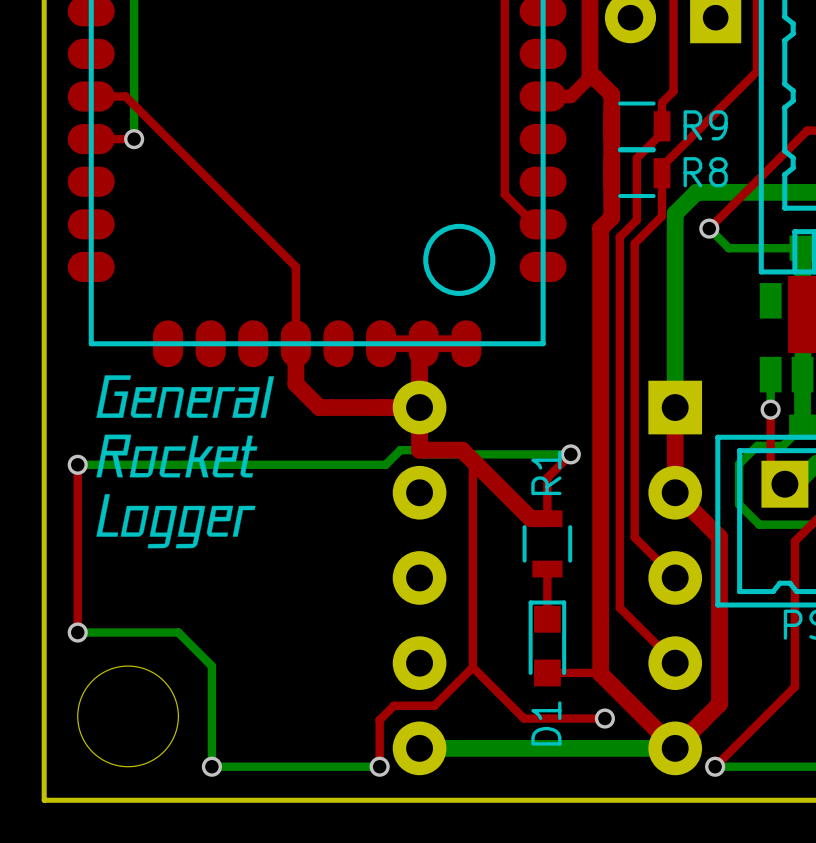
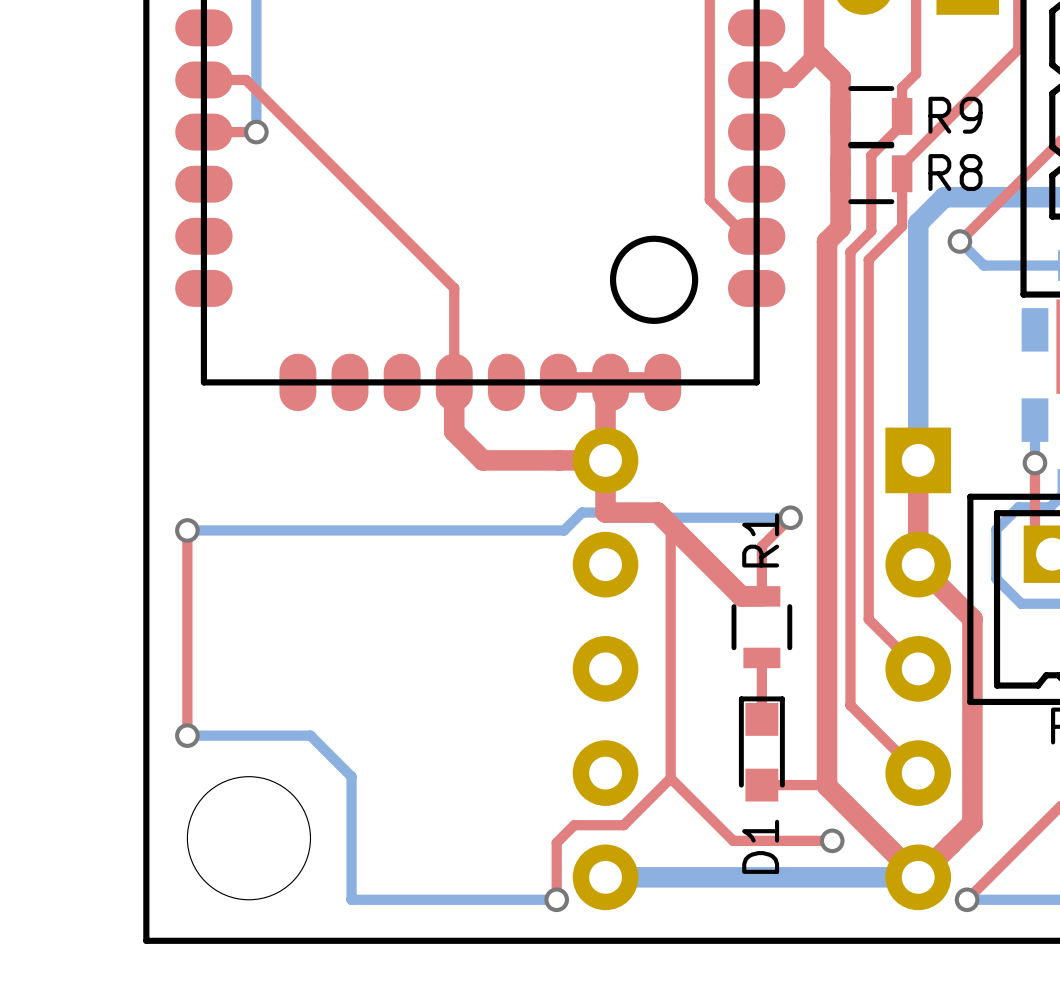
drawing: [96, 375, 274, 549] -> none
via: (211, 766) -> none

